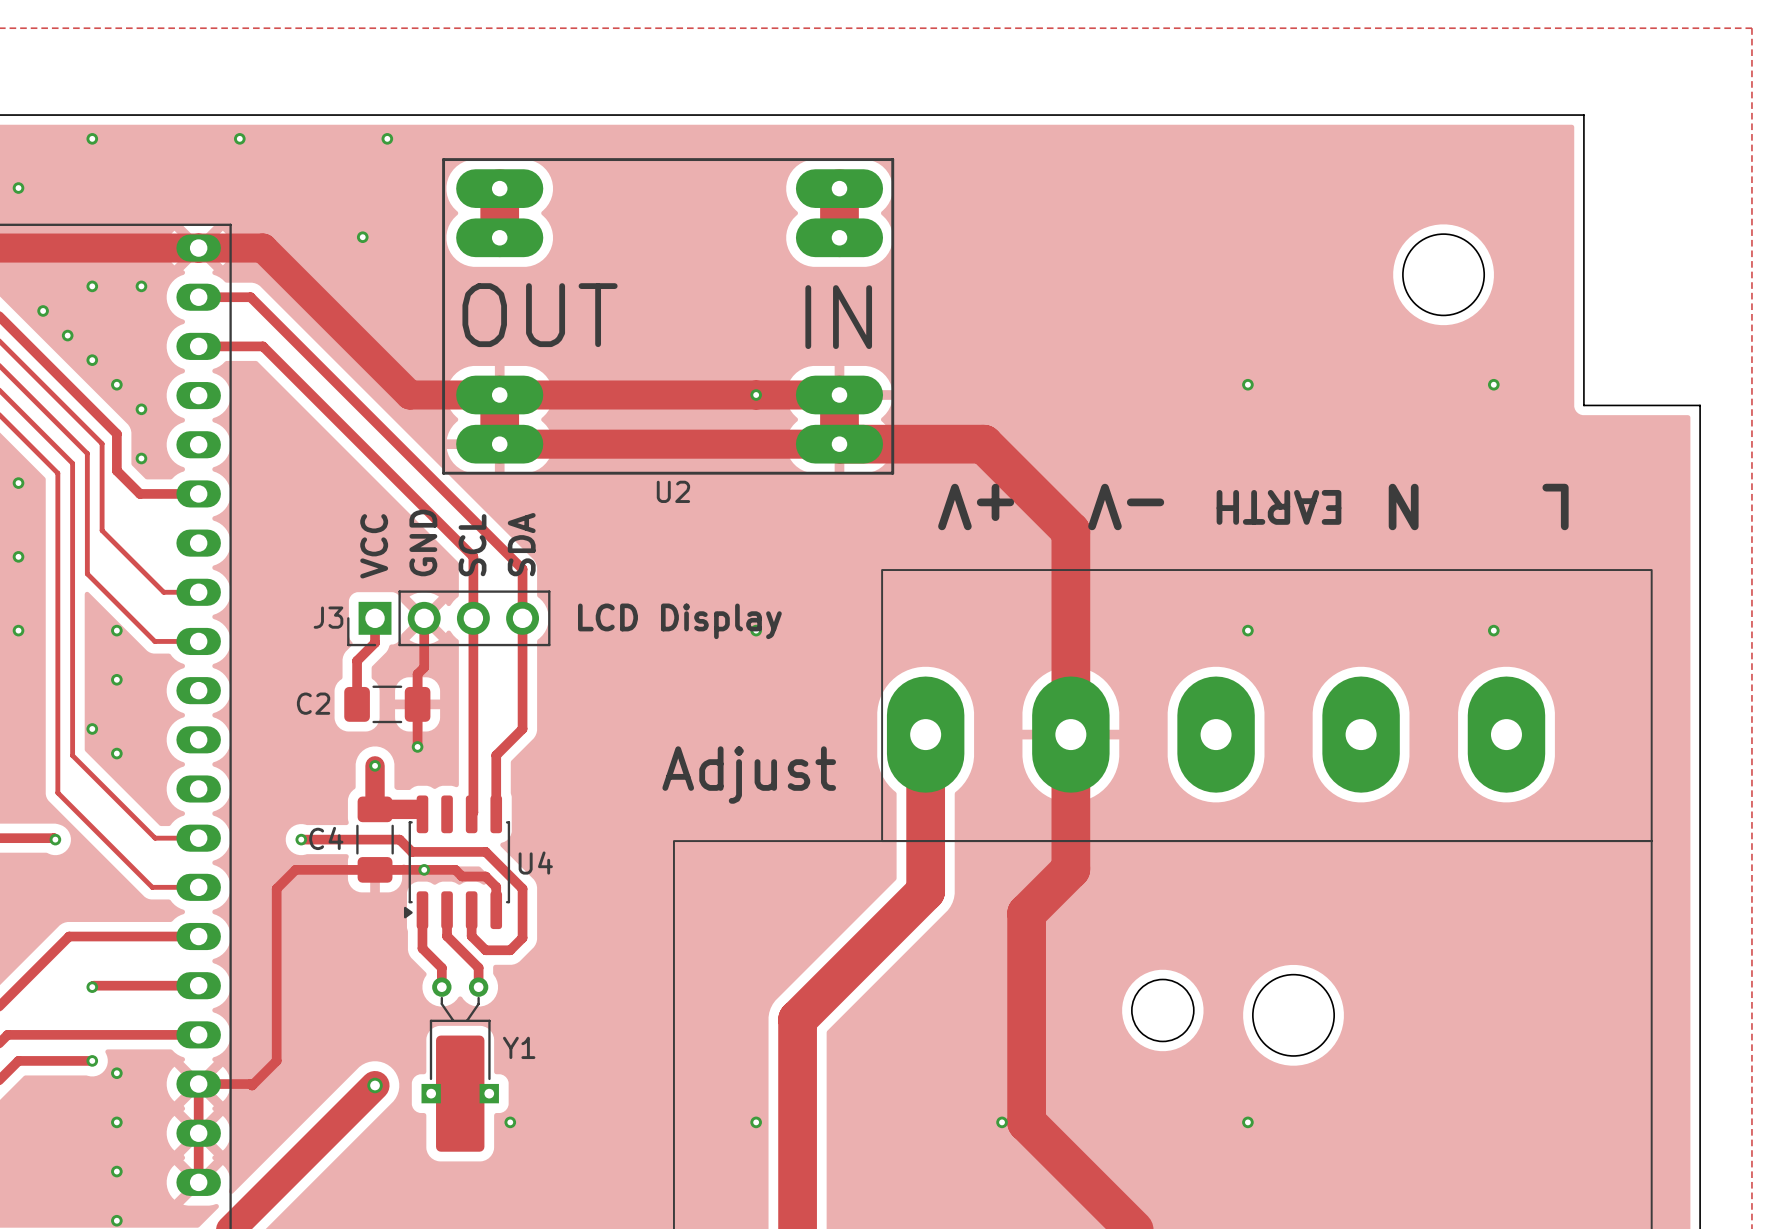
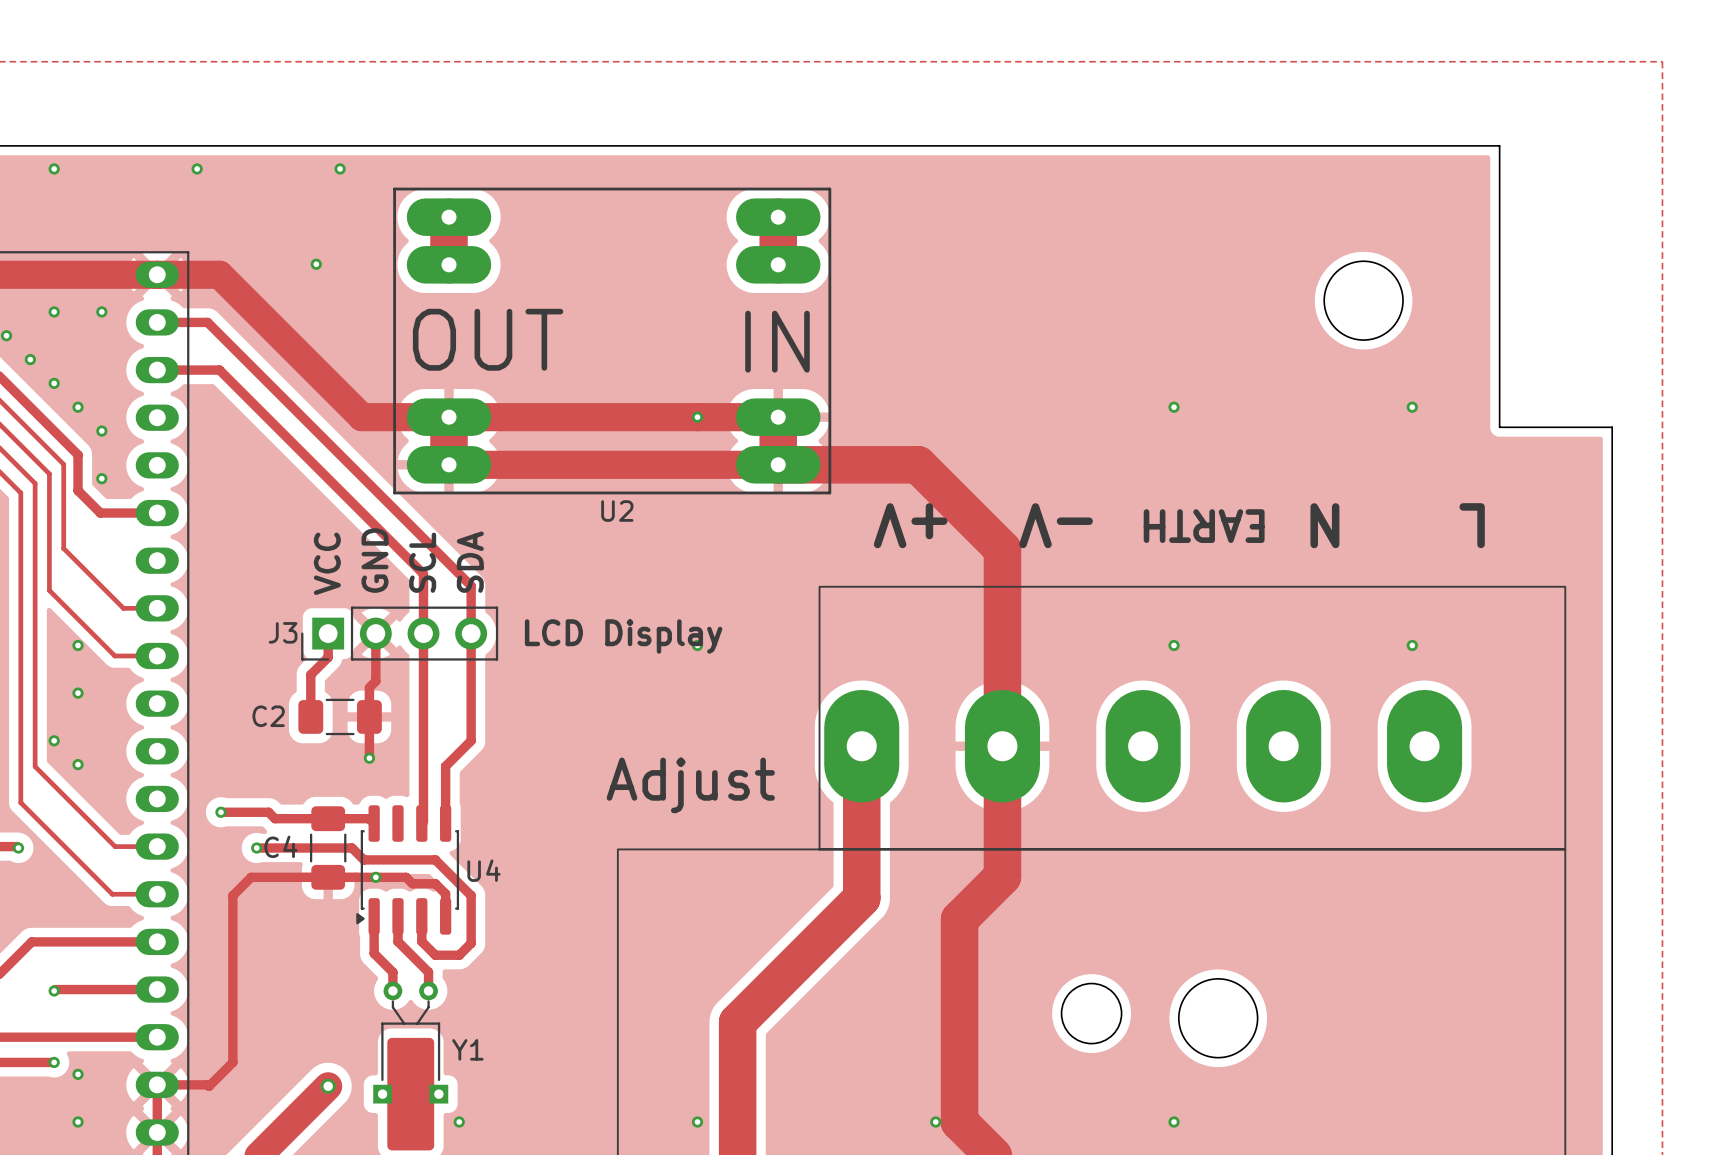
track: (375, 765) (375, 809) -> (220, 812) (268, 812) (275, 818) (328, 818)
via: (375, 765) -> none
via: none -> (220, 812)
track width: thick (375, 809) (417, 809) -> thin (328, 818) (369, 818)

